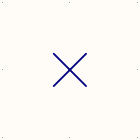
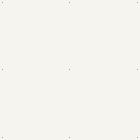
no-connect mark: (69, 69) -> none

